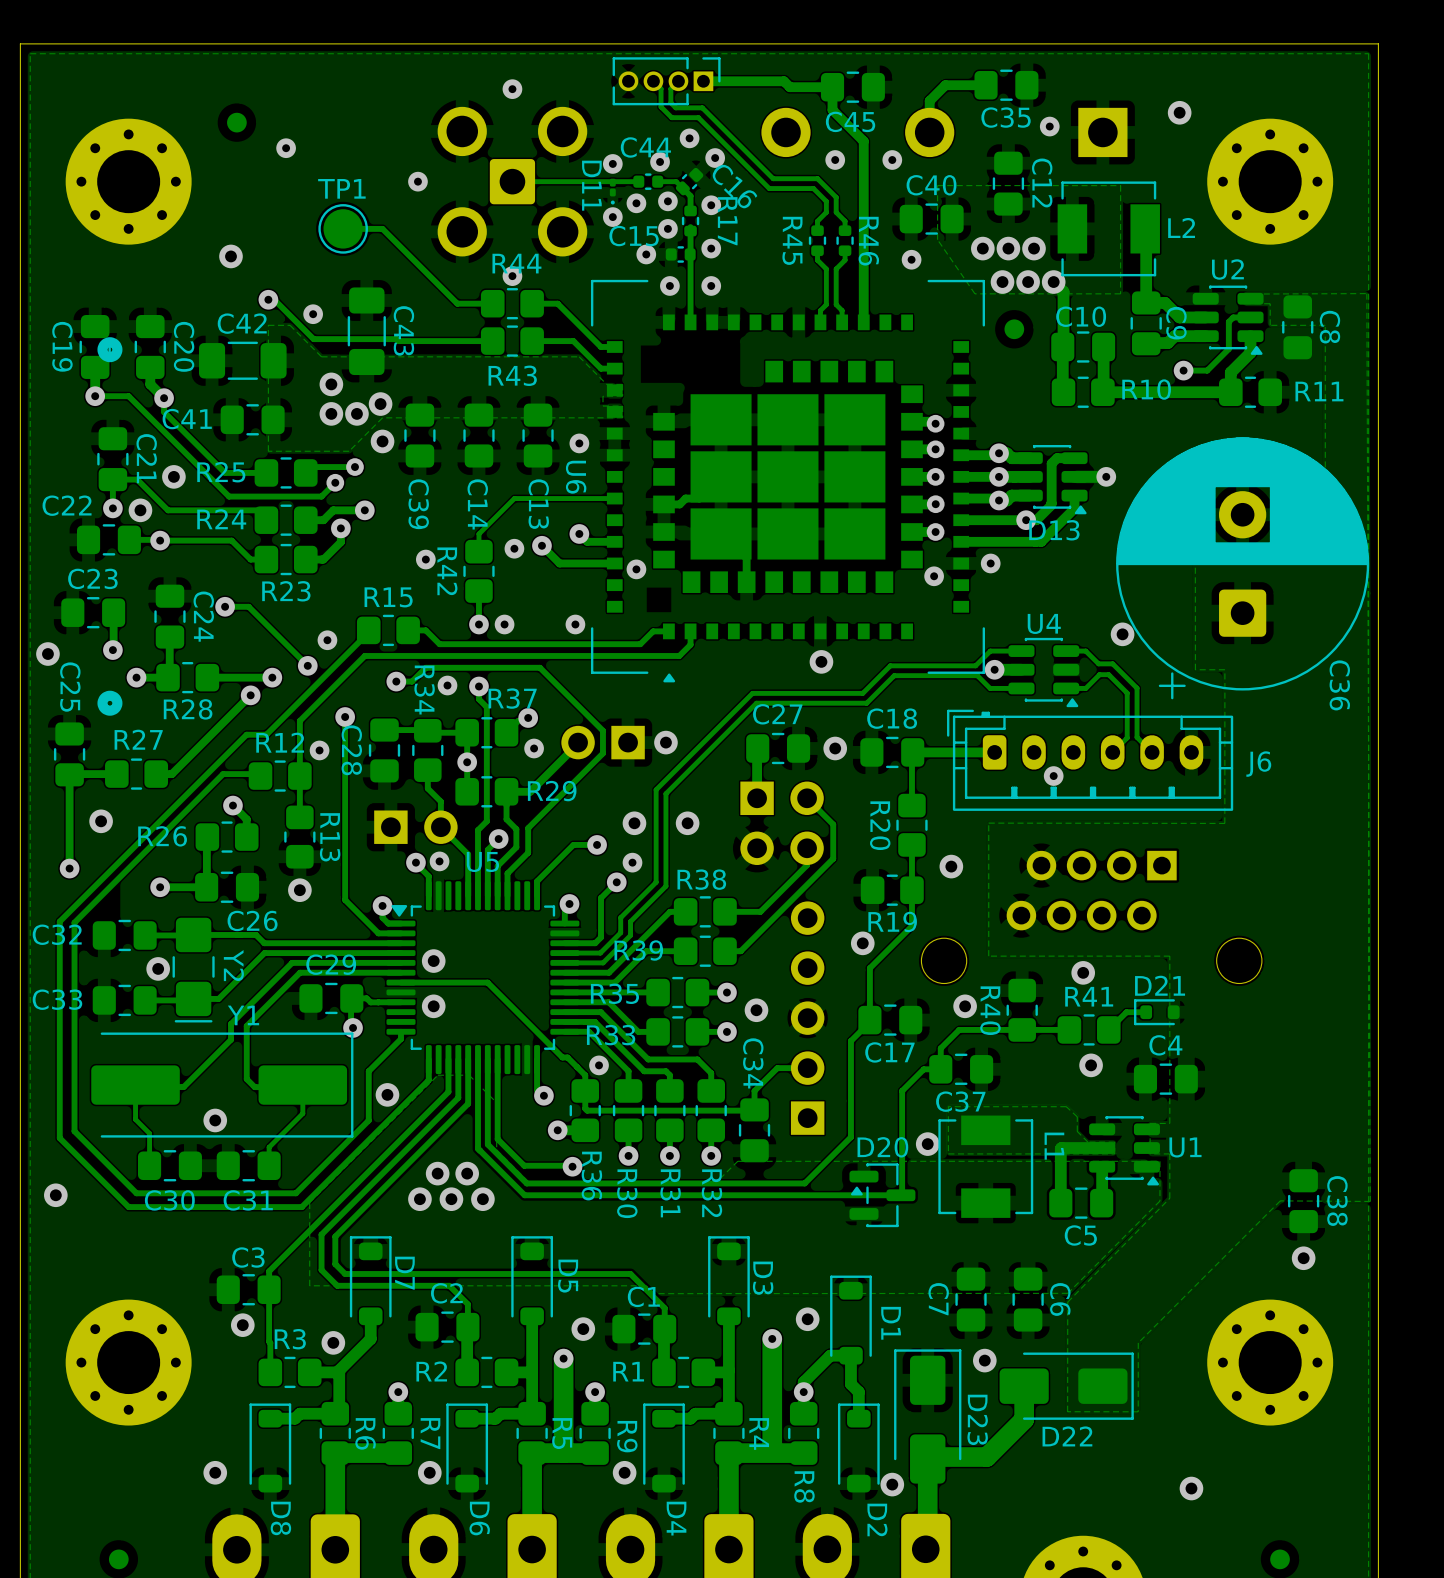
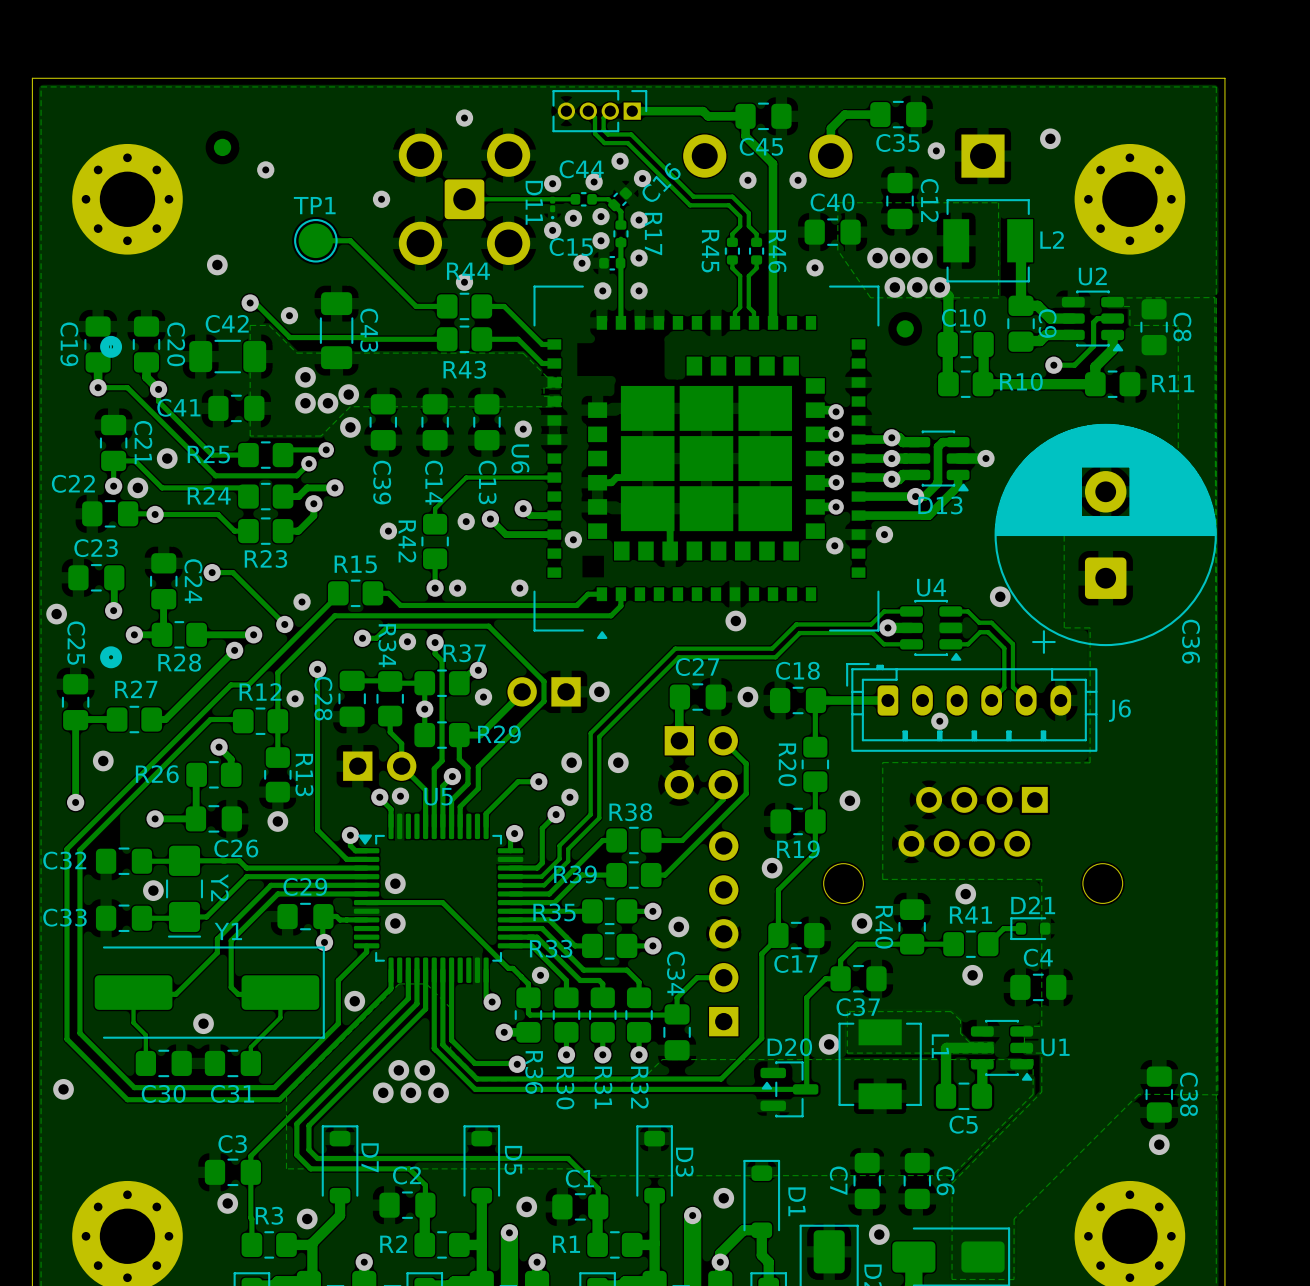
C16 name rotation: 0° (734, 186) -> 90° counterclockwise (661, 182)

